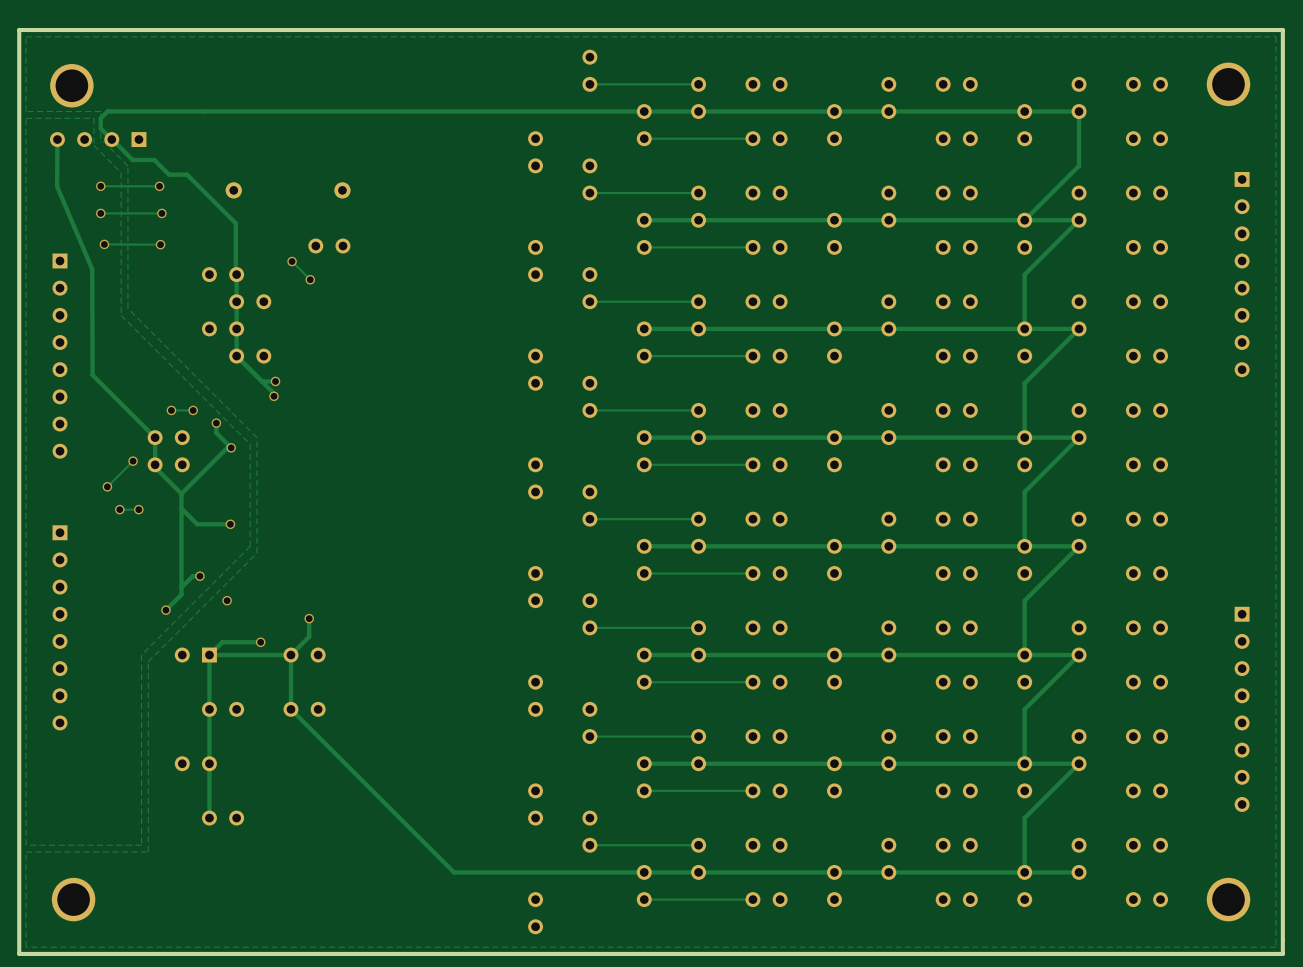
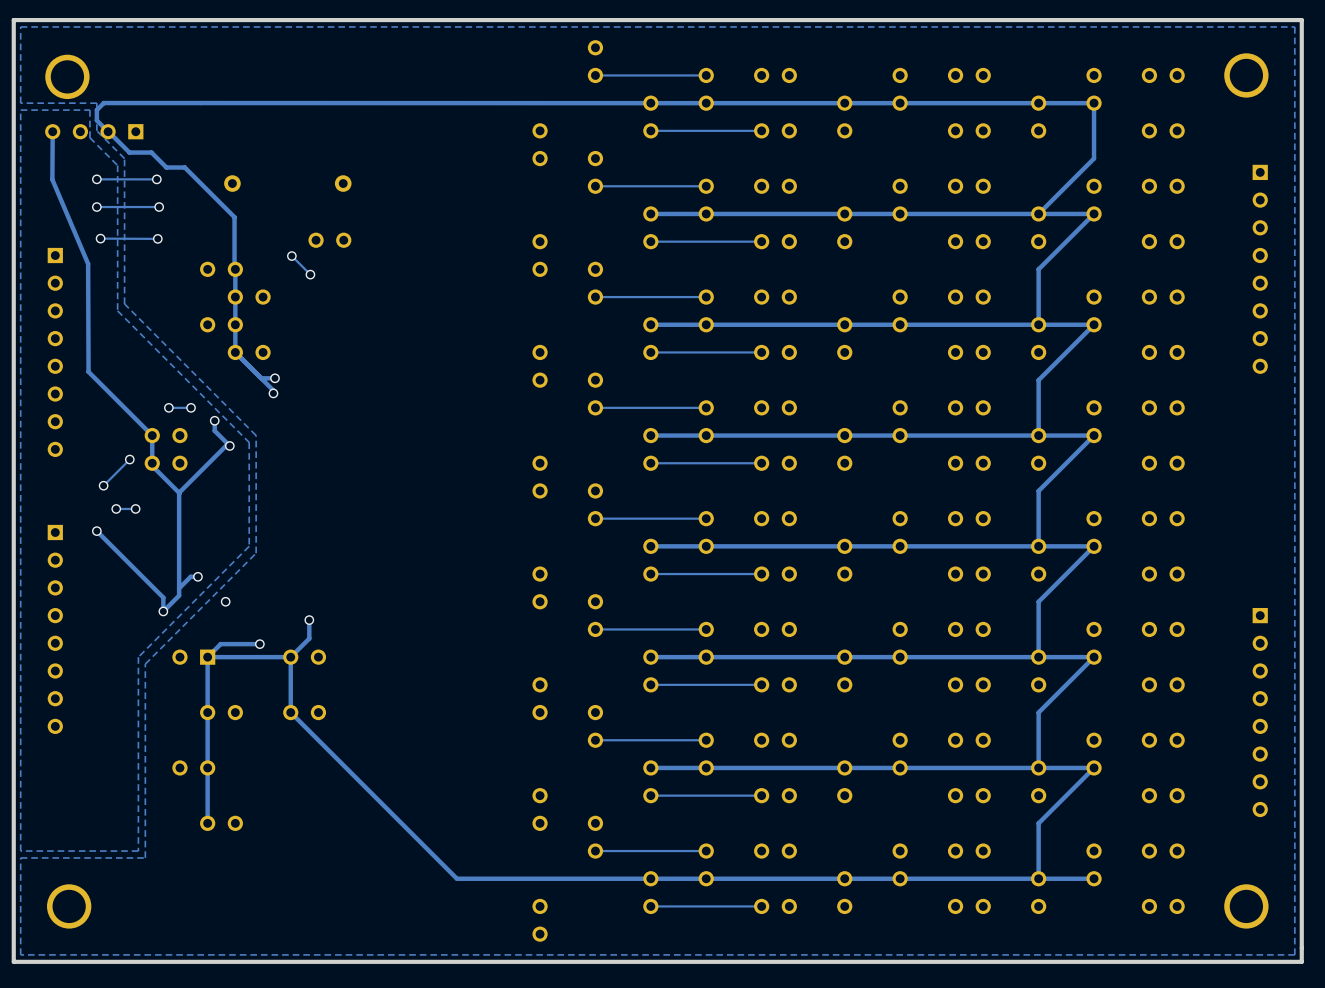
track: (181, 508) (197, 524) (230, 524) -> none
via: (230, 524) -> none
track: none -> (96, 531) (163, 597) (163, 611)
via: none -> (96, 531)

